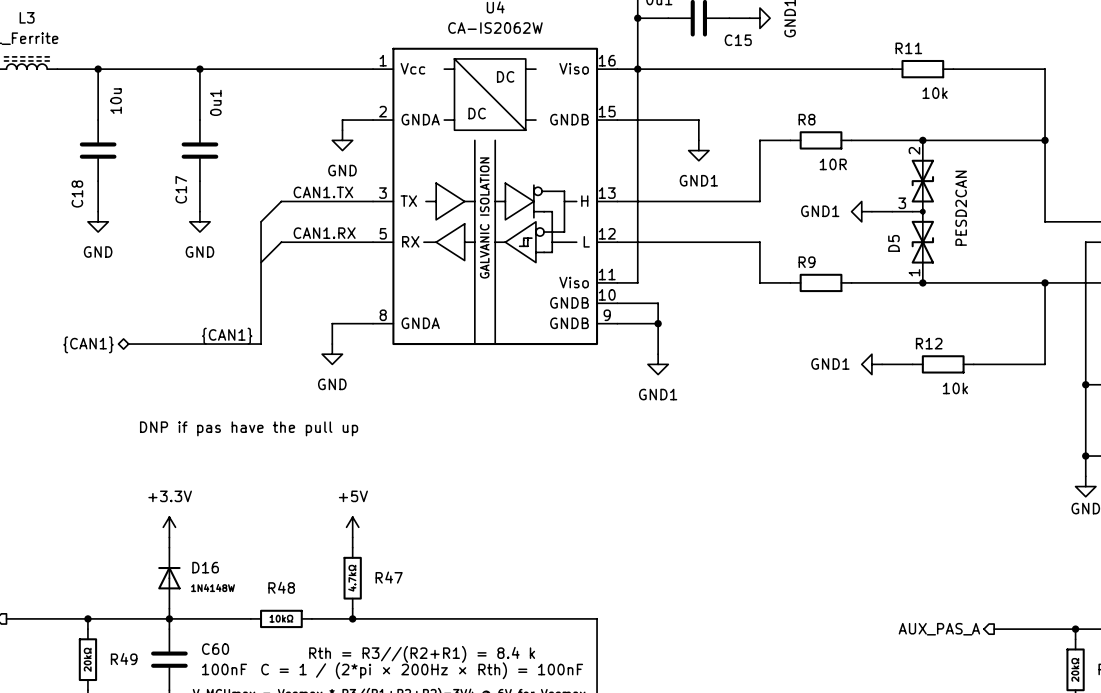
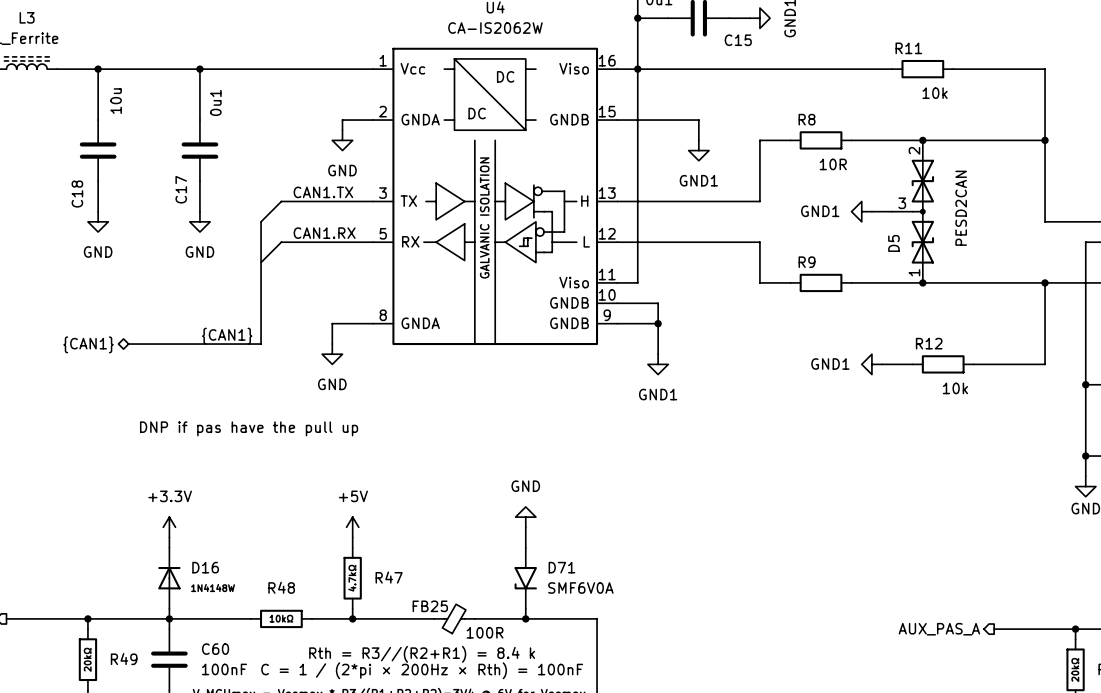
power symbol: none -> GND (525, 517)
wire: none -> (525, 527) (525, 547)
D71: none -> SMF6V0A (525, 578)
wire: none -> (525, 608) (525, 618)
FB25: none -> 100R (454, 618)
junction: none -> (525, 618)

